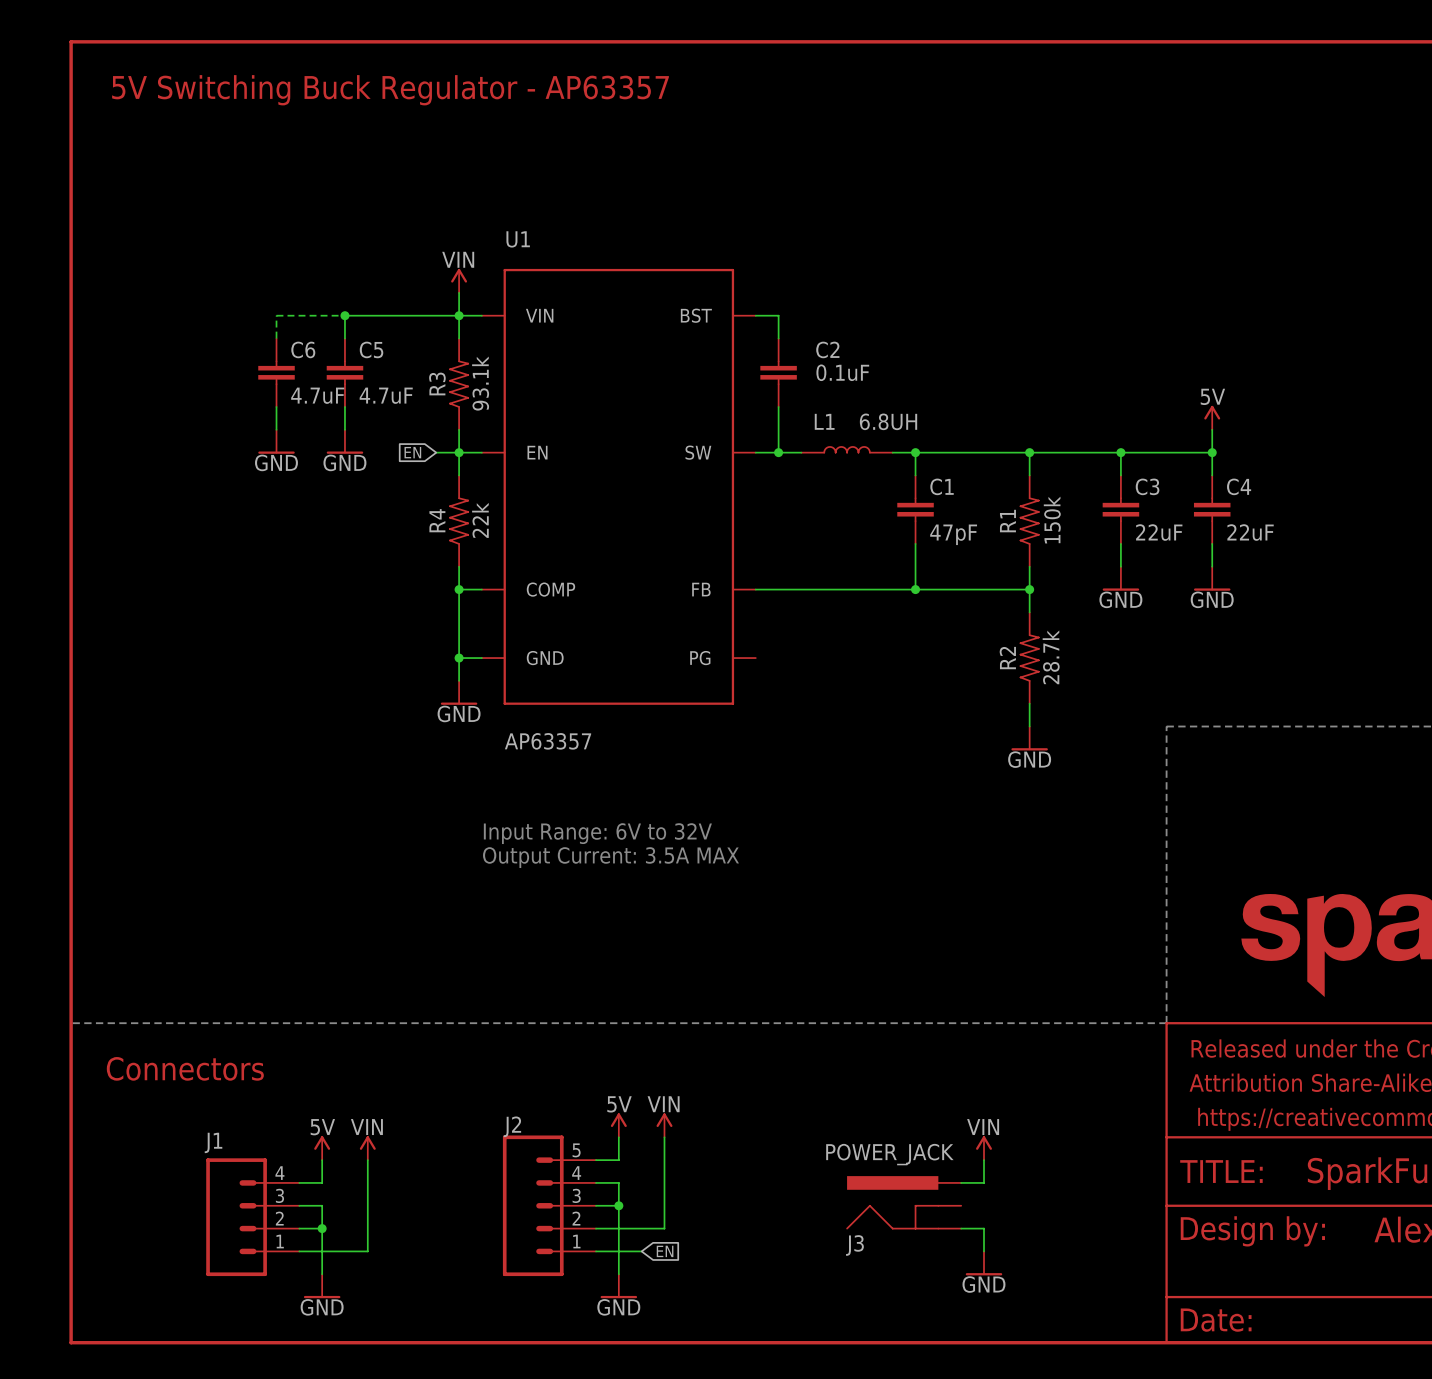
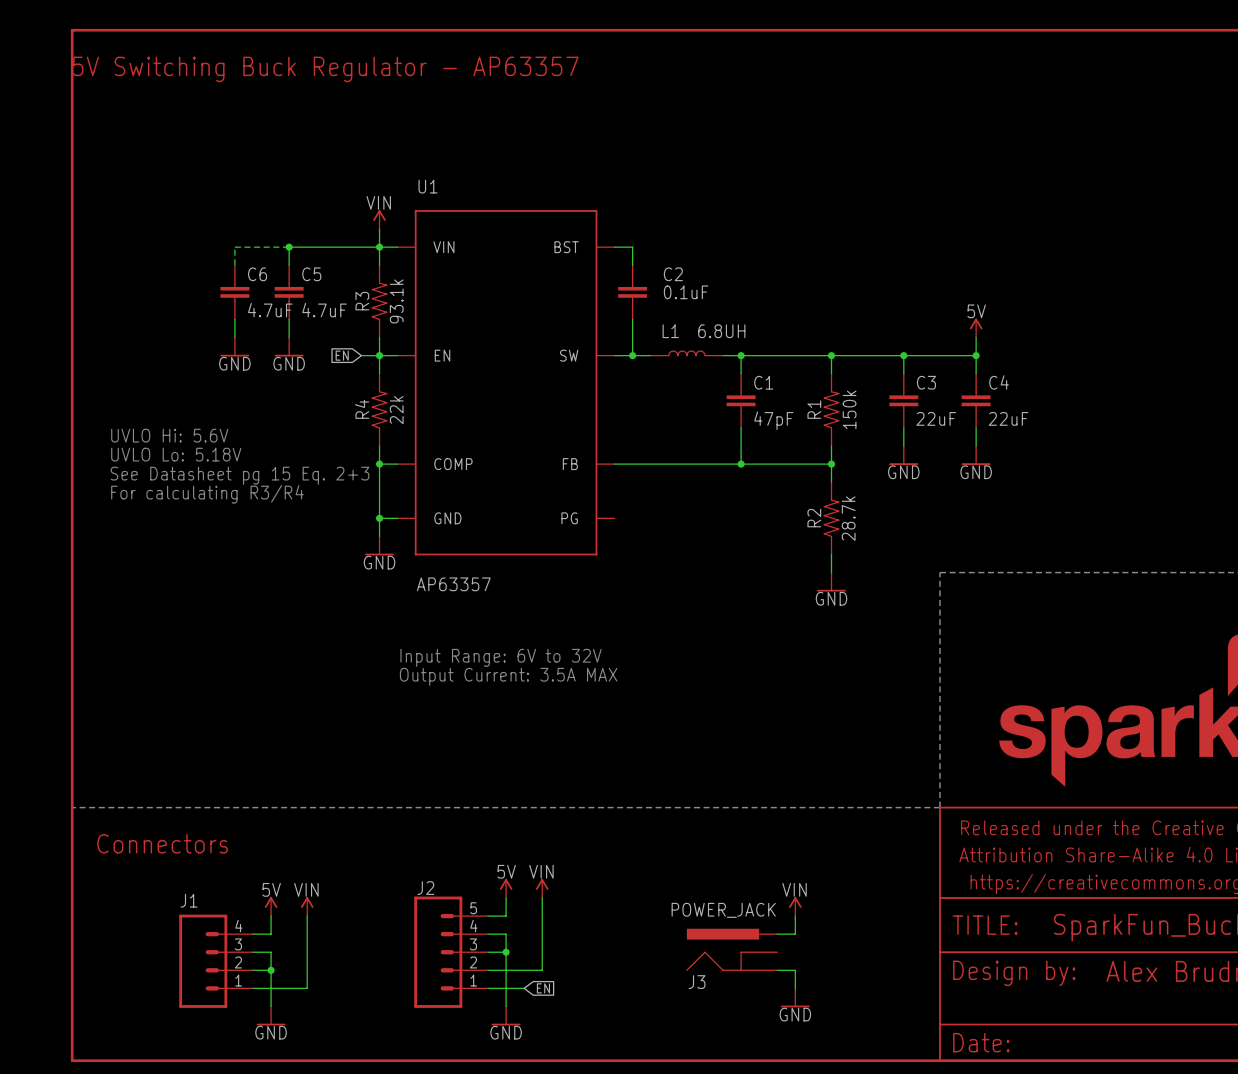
text: none -> UVLO Hi: 5.6V (169, 435)
text: none -> UVLO Lo: 5.18V (176, 454)
text: none -> See Datasheet pg 15 Eq. 2+3 (240, 475)
text: none -> For calculating R3/R4 (207, 494)

